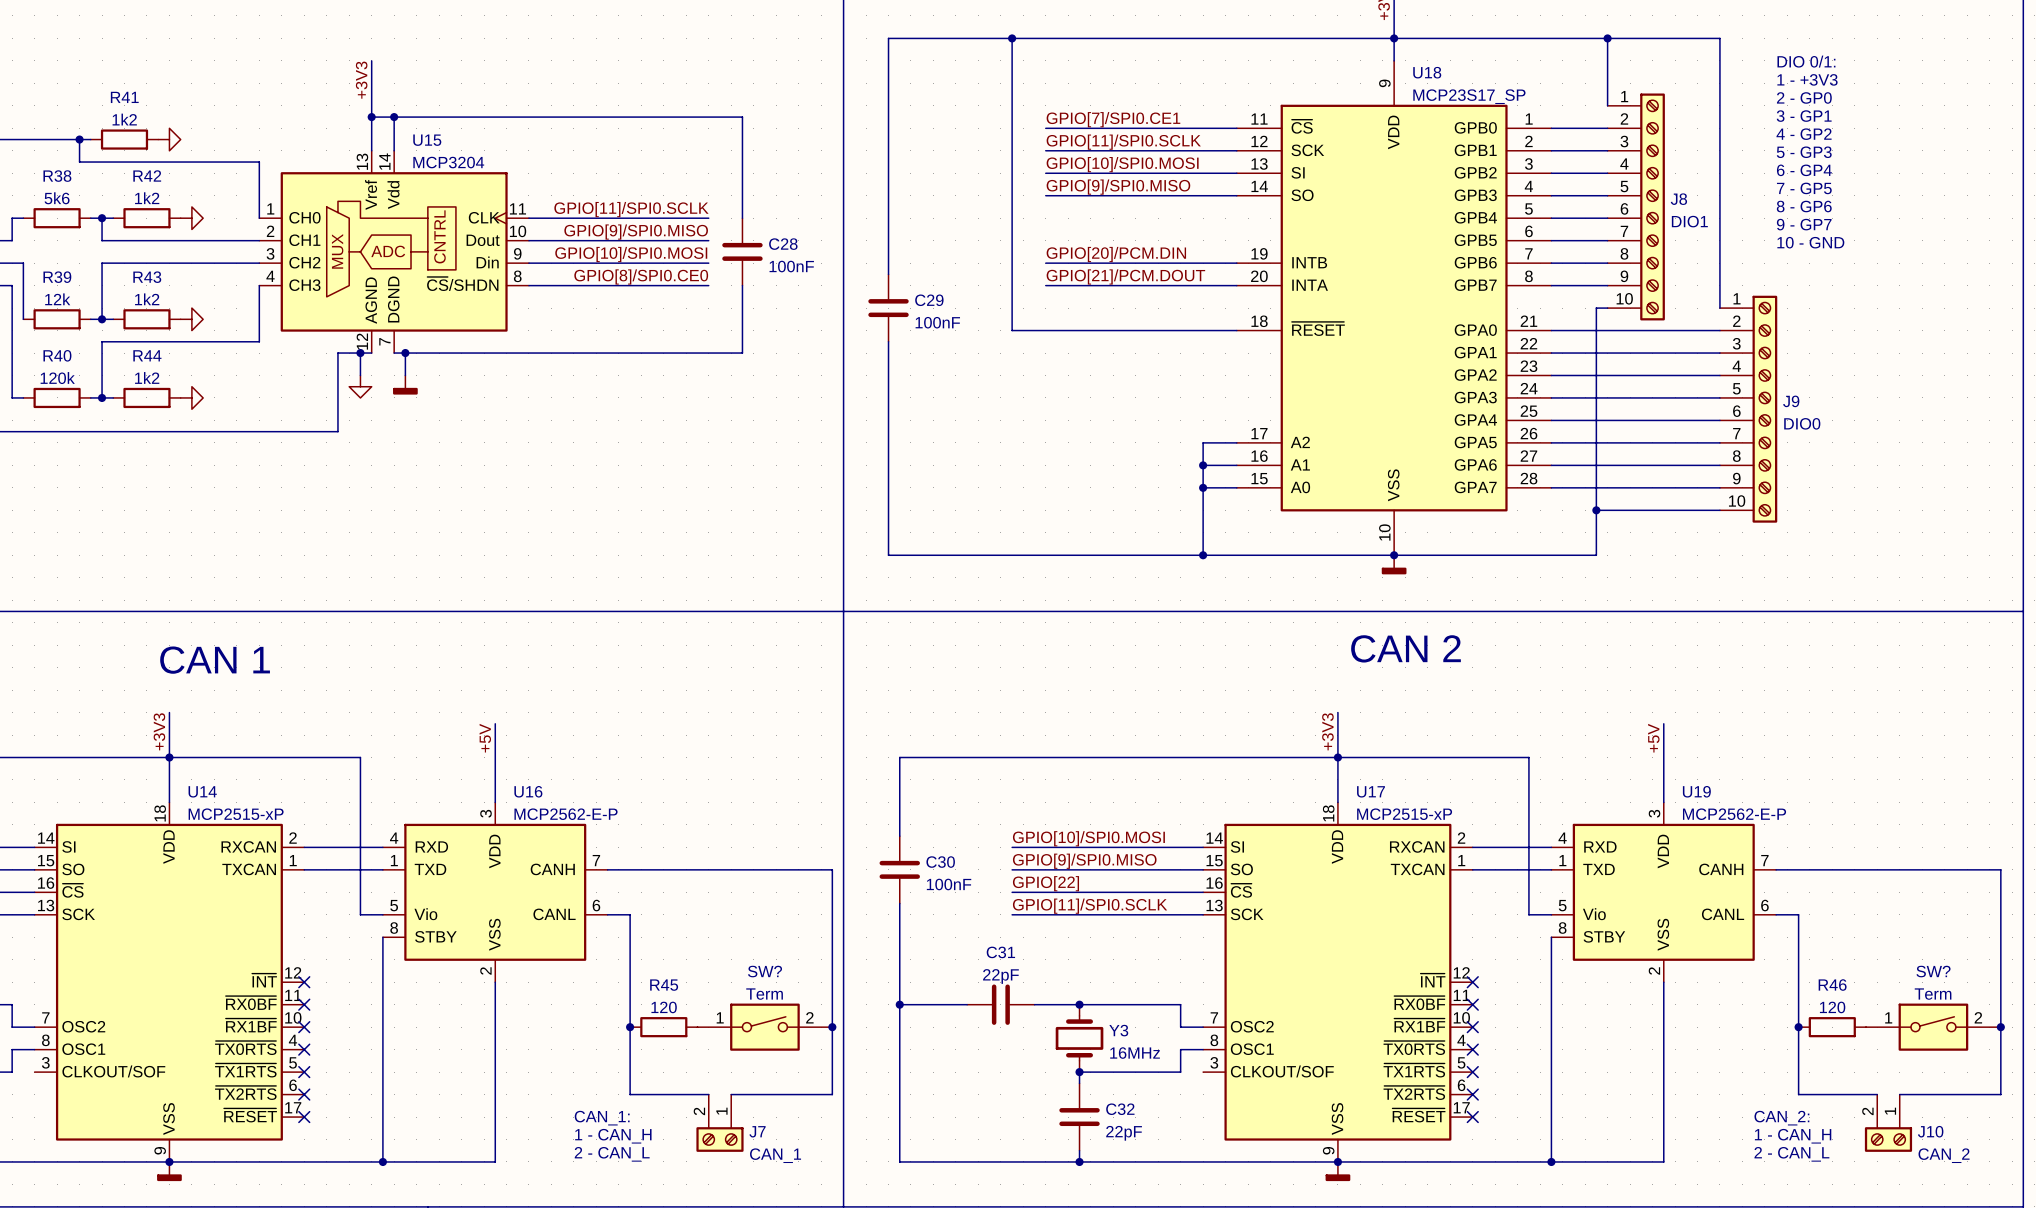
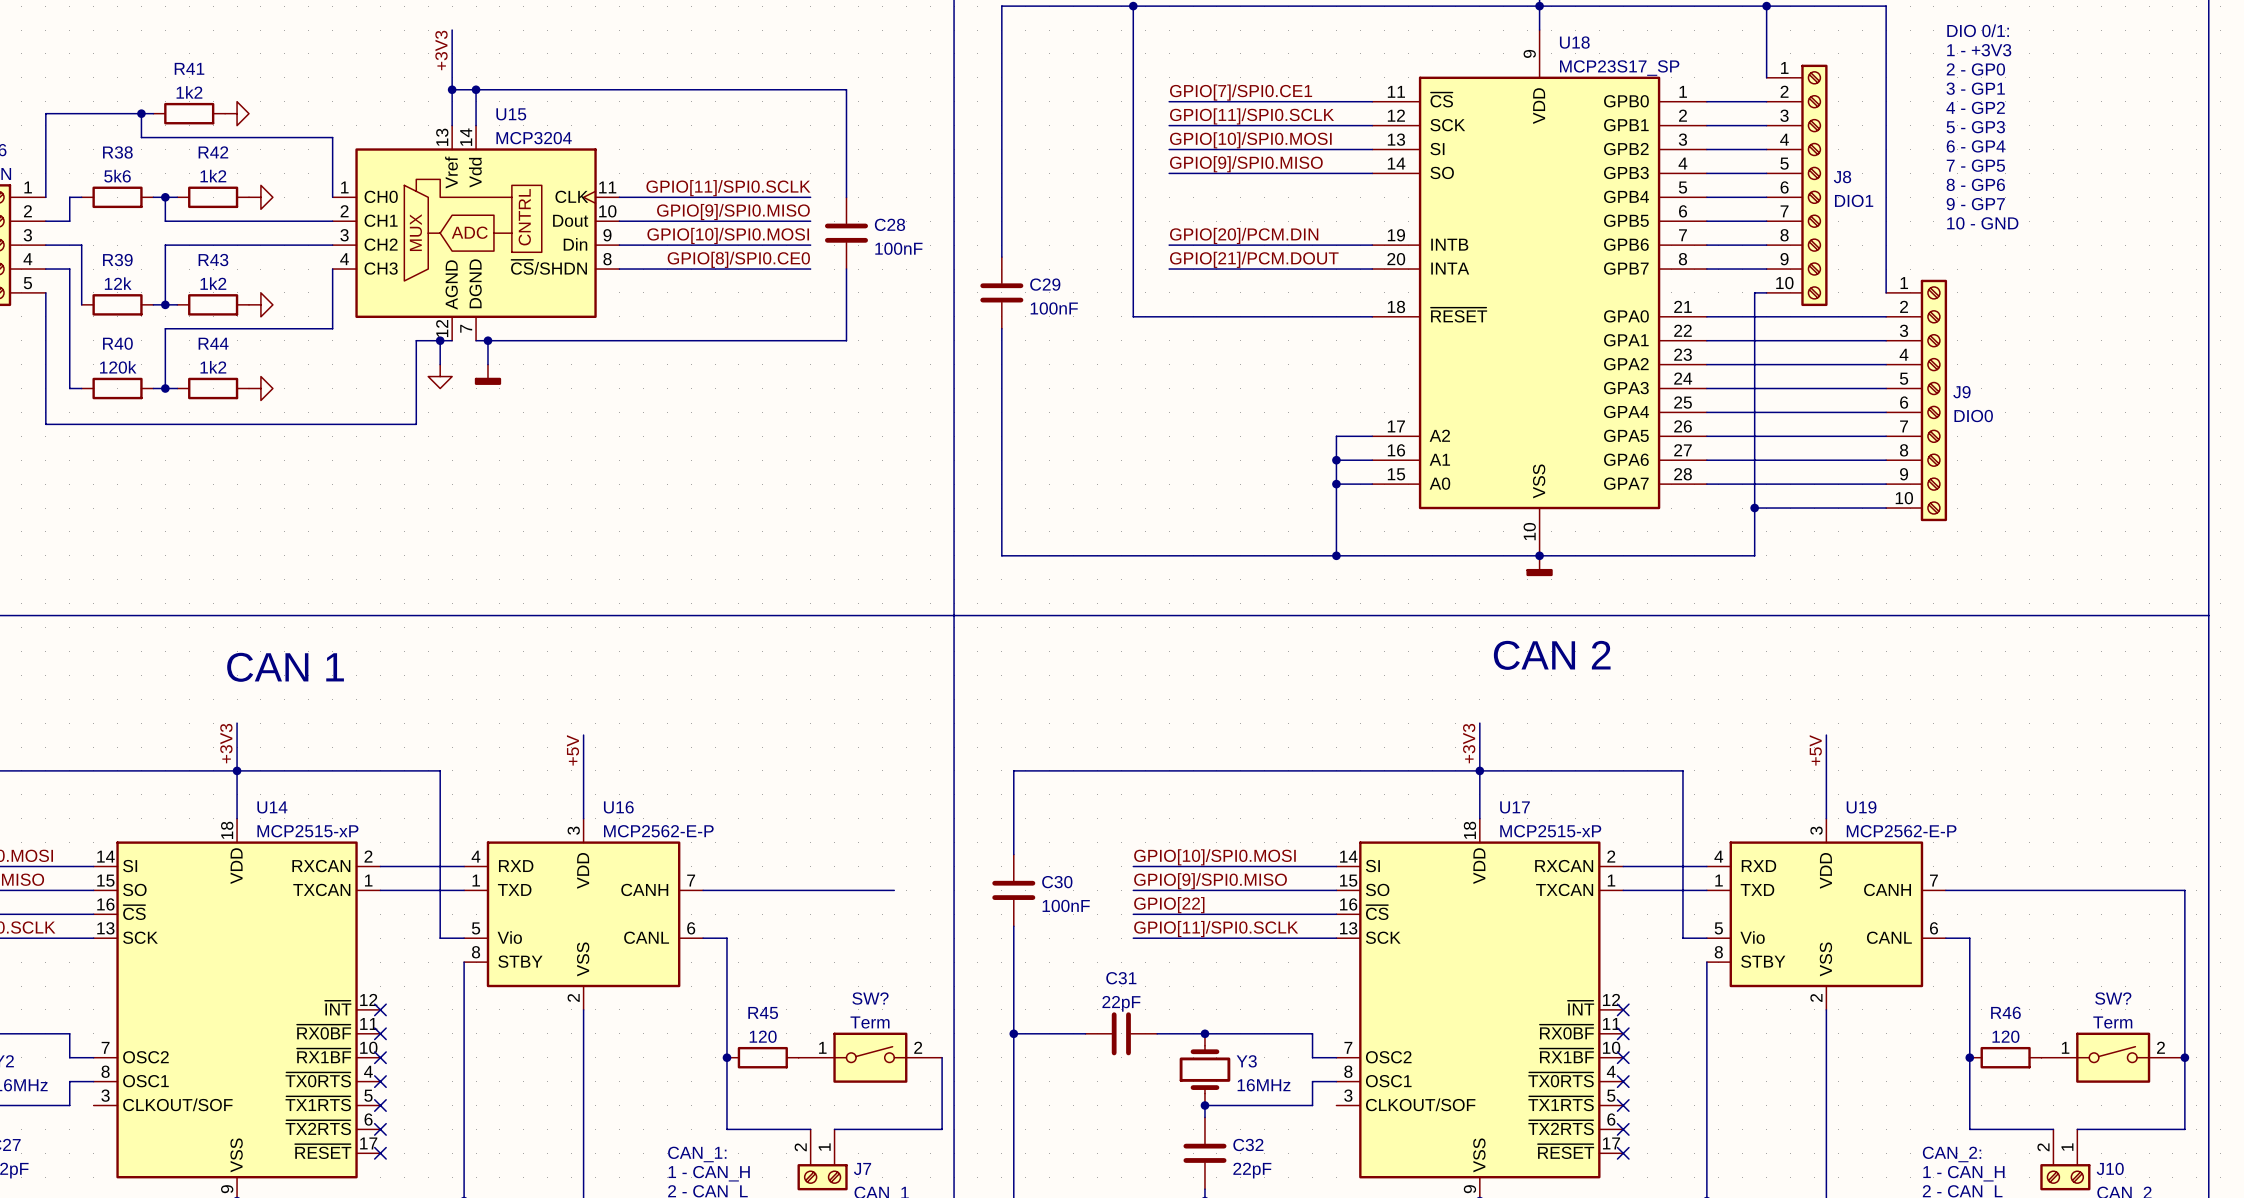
wire: (787, 869) (832, 869) (832, 1027) -> none
junction: (832, 1027) -> none

